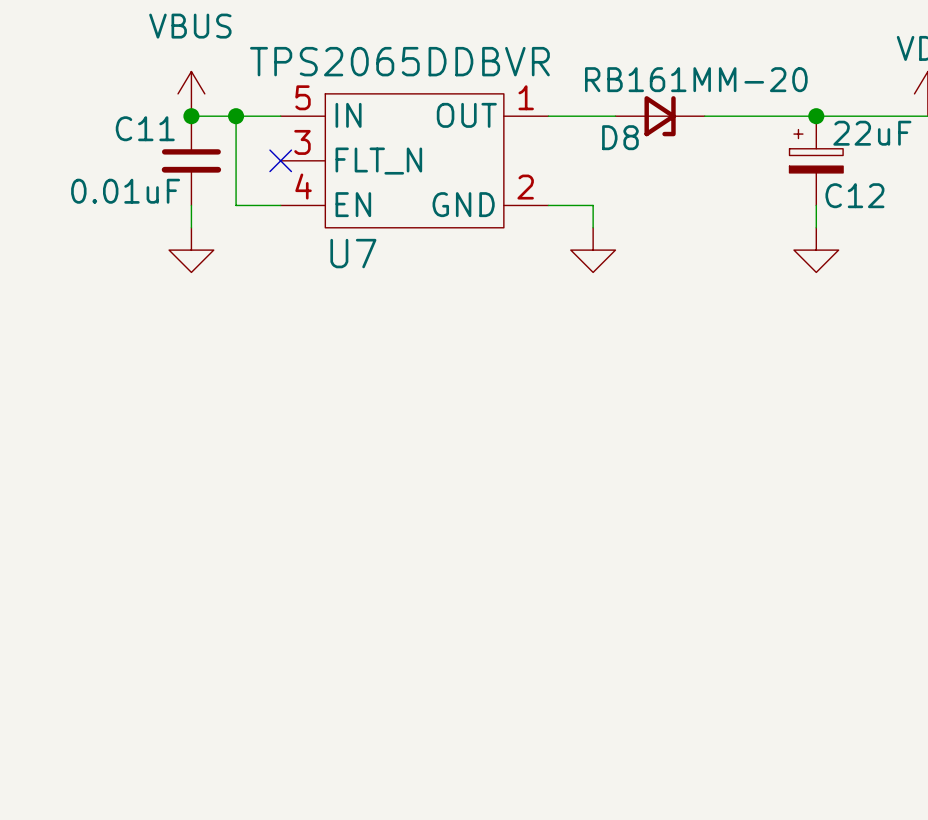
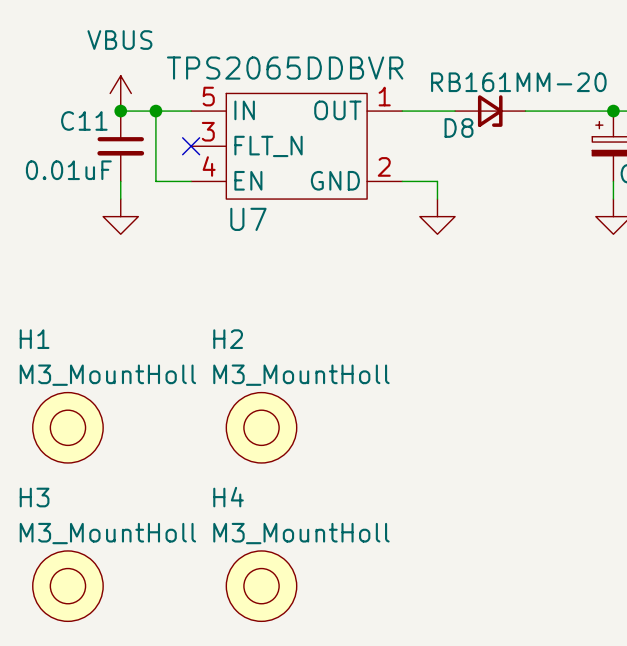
H1: none -> M3_MountHoll (67, 427)
H2: none -> M3_MountHoll (261, 427)
H3: none -> M3_MountHoll (67, 586)
H4: none -> M3_MountHoll (261, 586)

